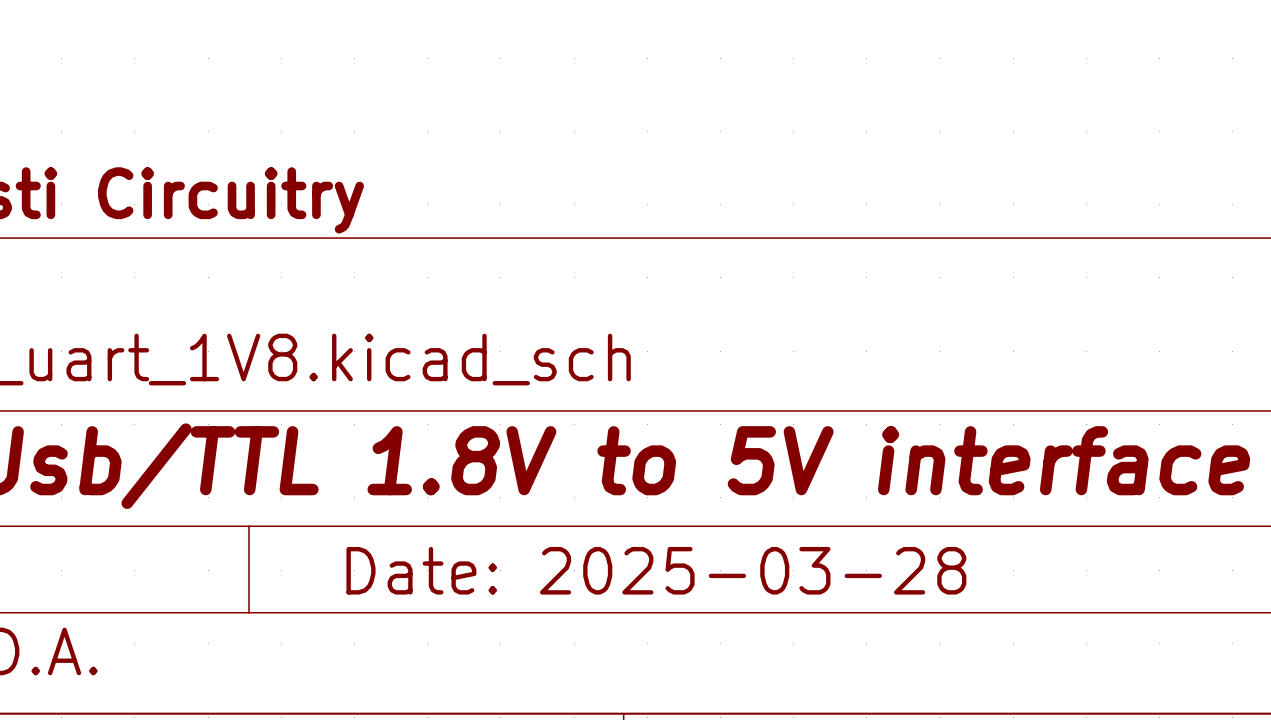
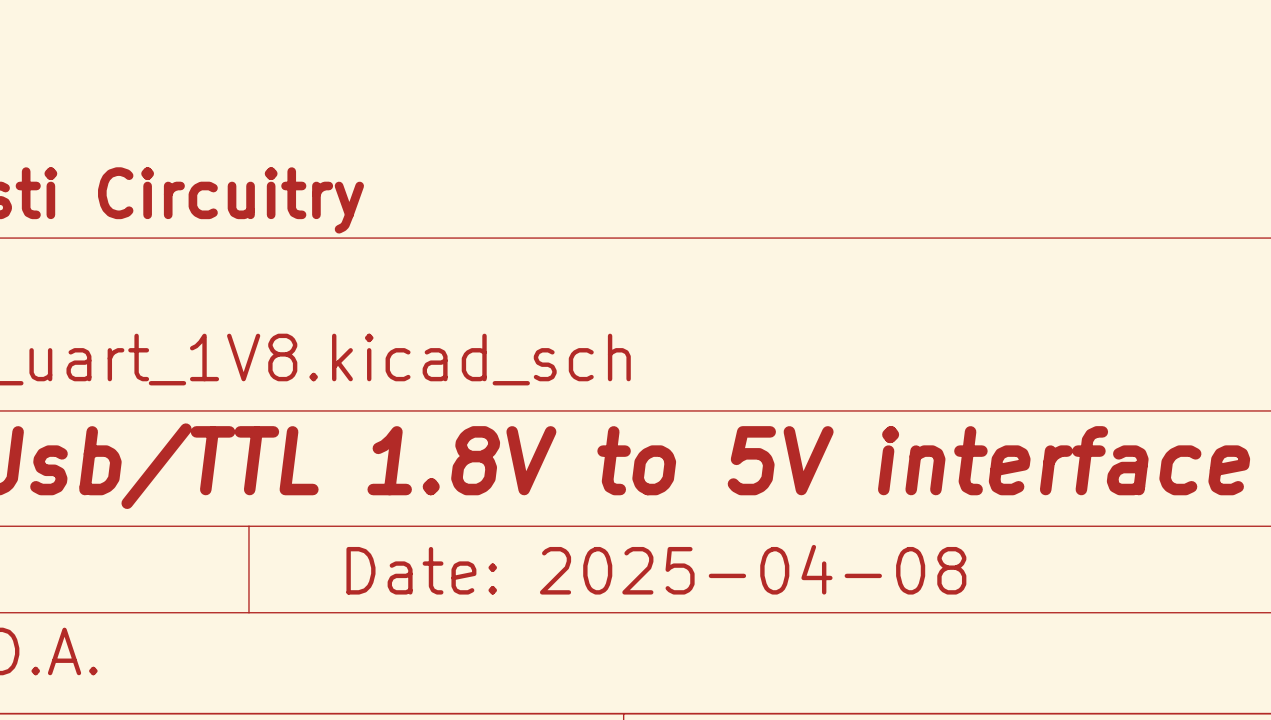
title block: Date: 2025-03-28 (656, 570) -> Date: 2025-04-08 (656, 569)

